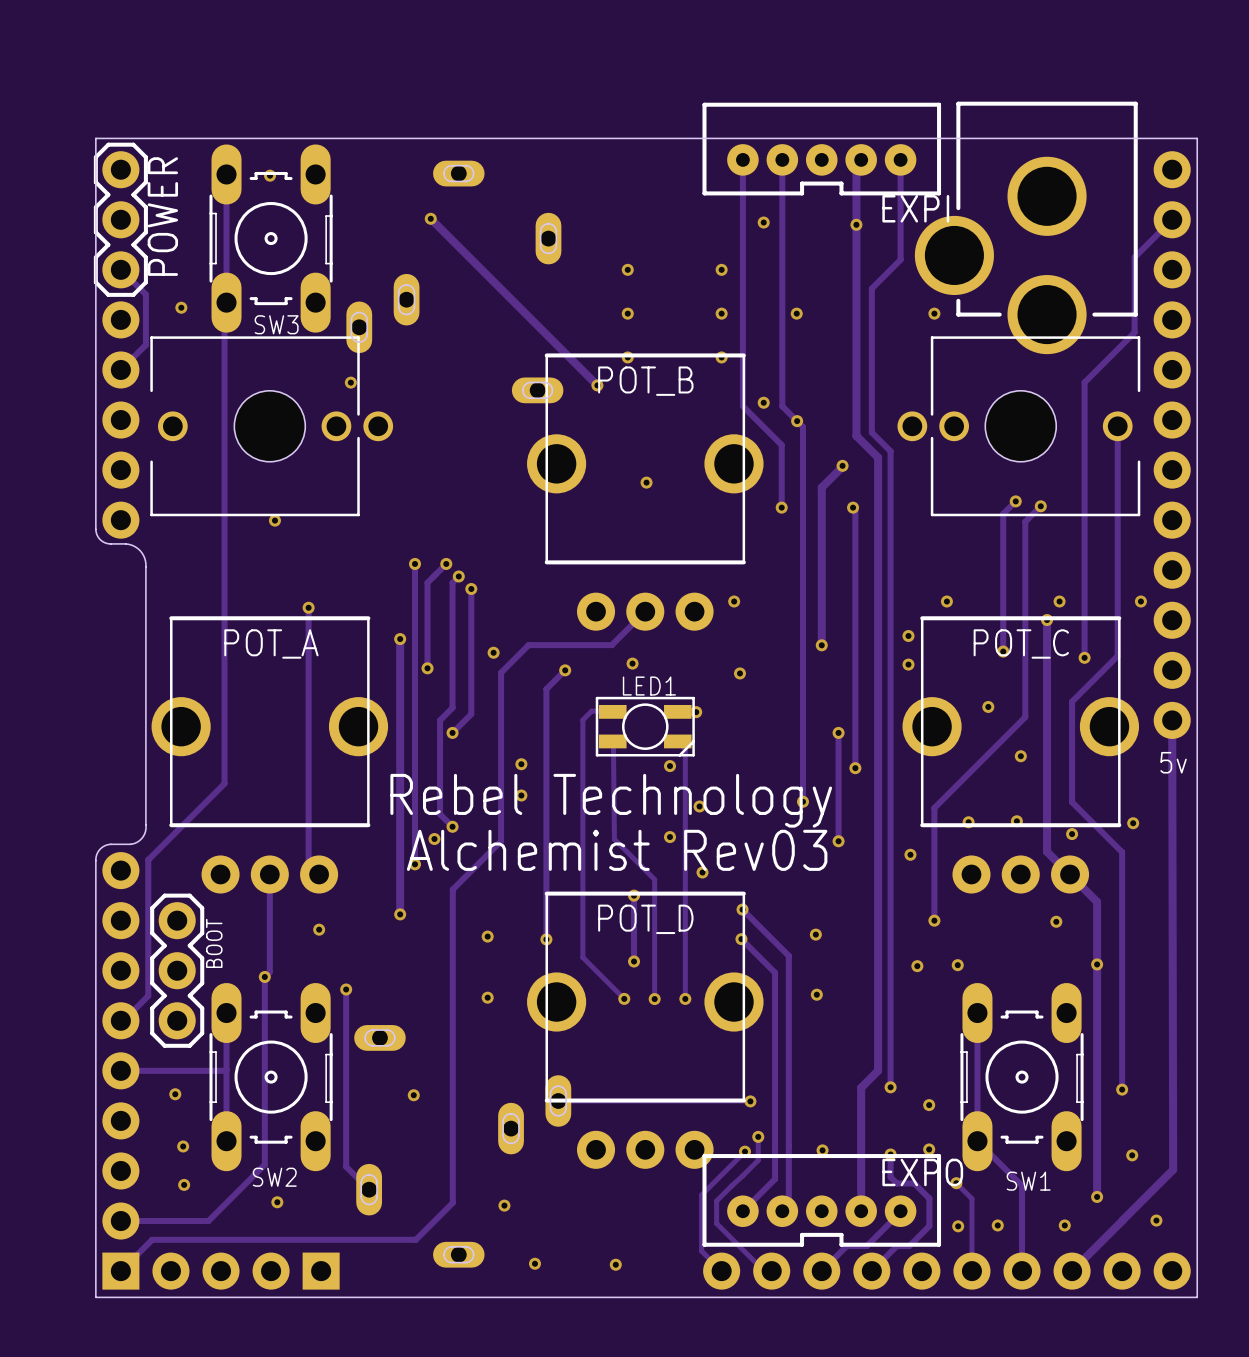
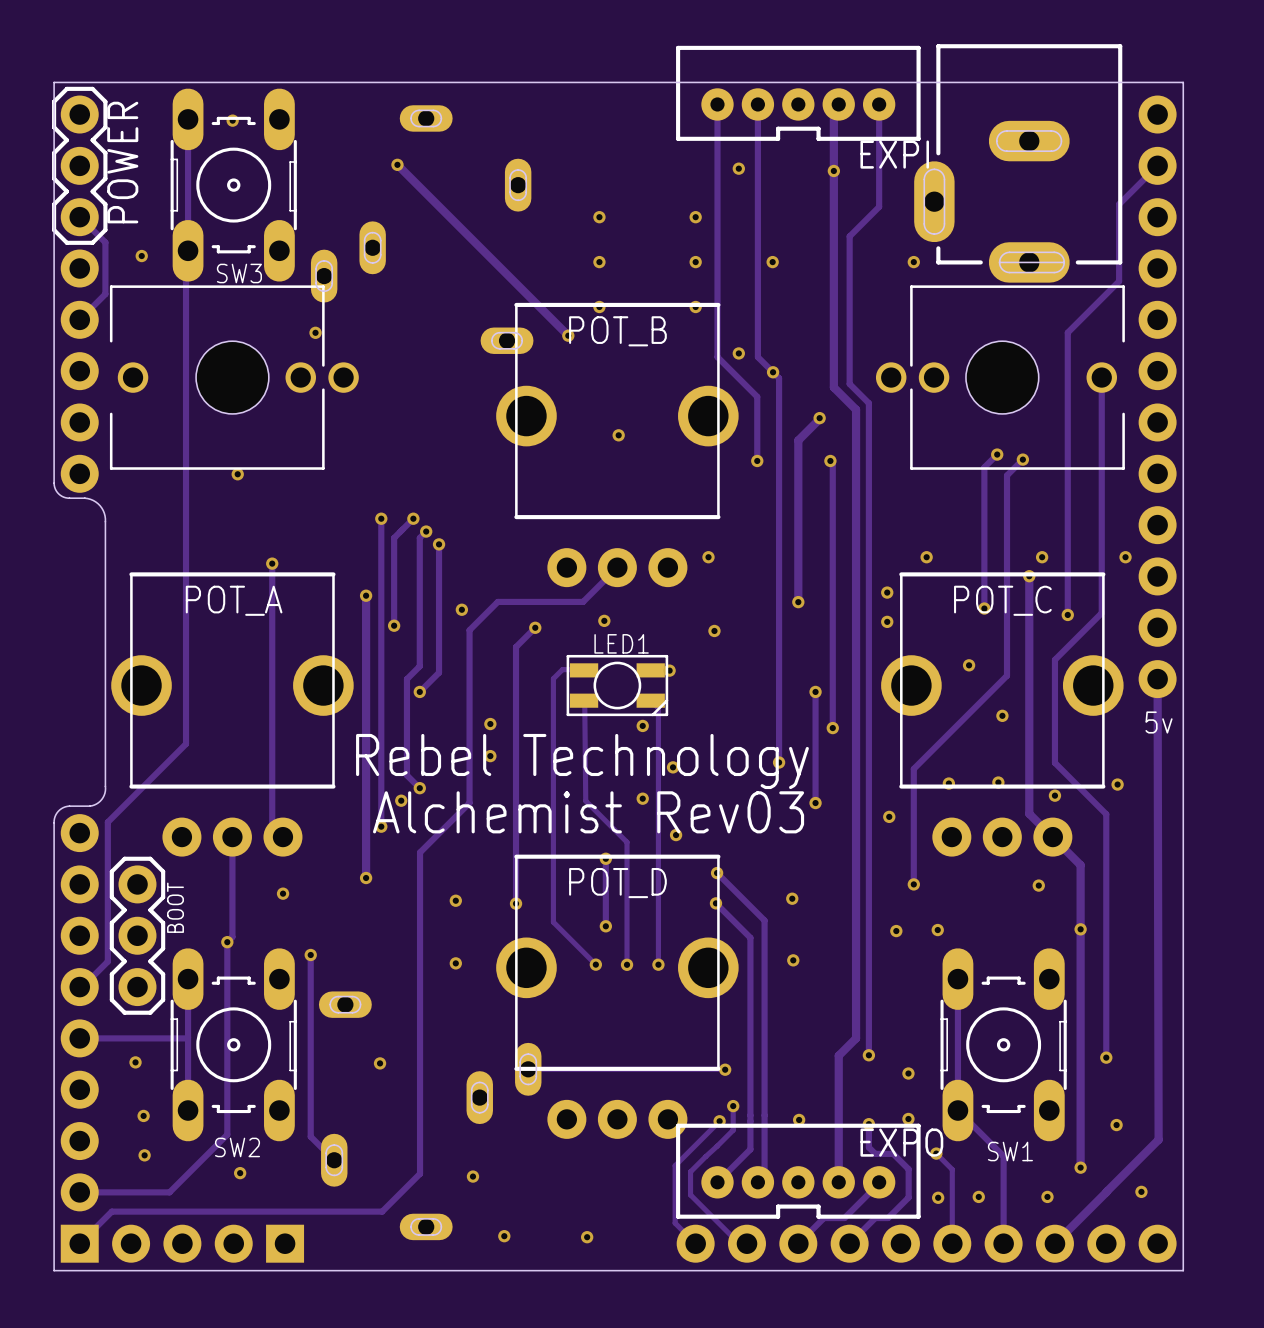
part footprint: [914, 101, 1138, 355] -> [914, 44, 1123, 283]

